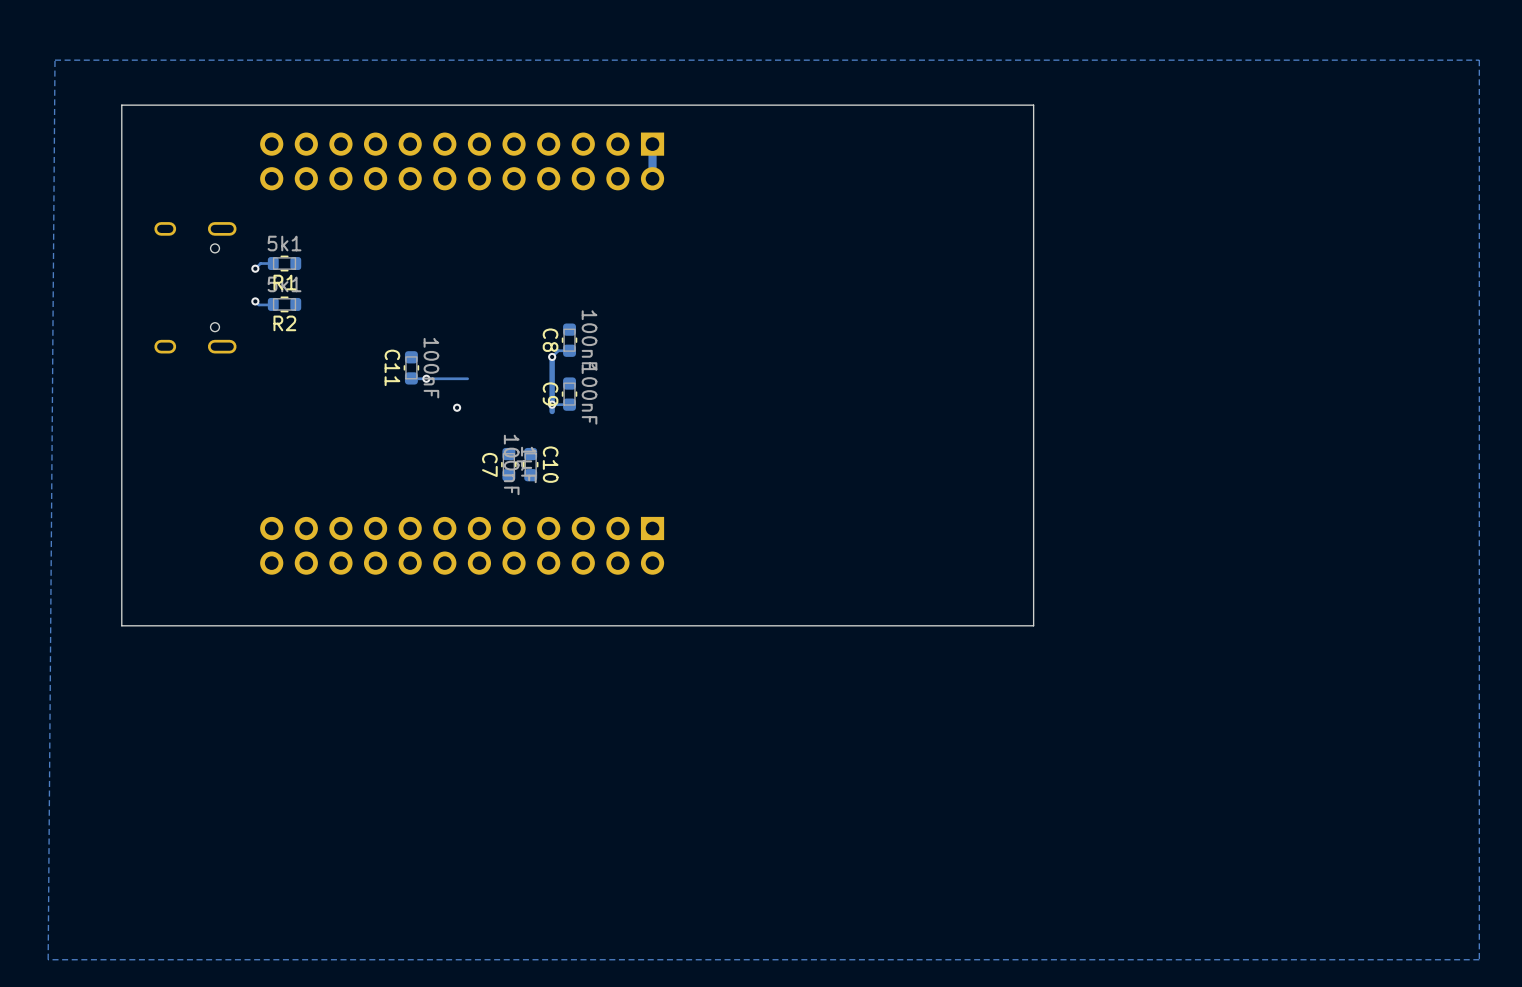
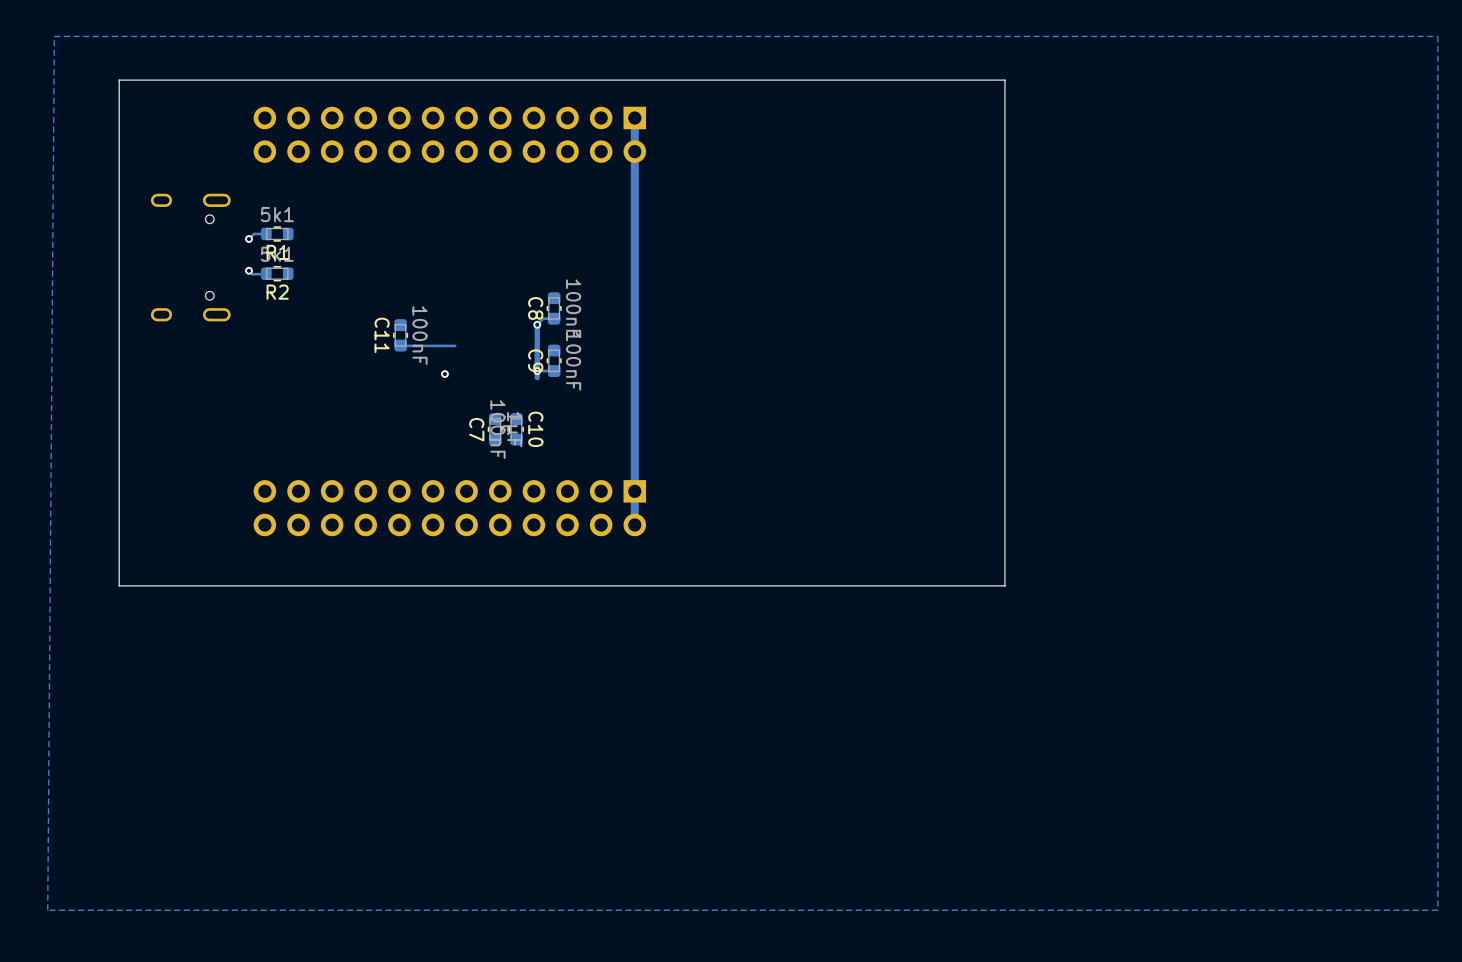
track: none -> (634, 151) (634, 524)
via: (426, 378) -> none

